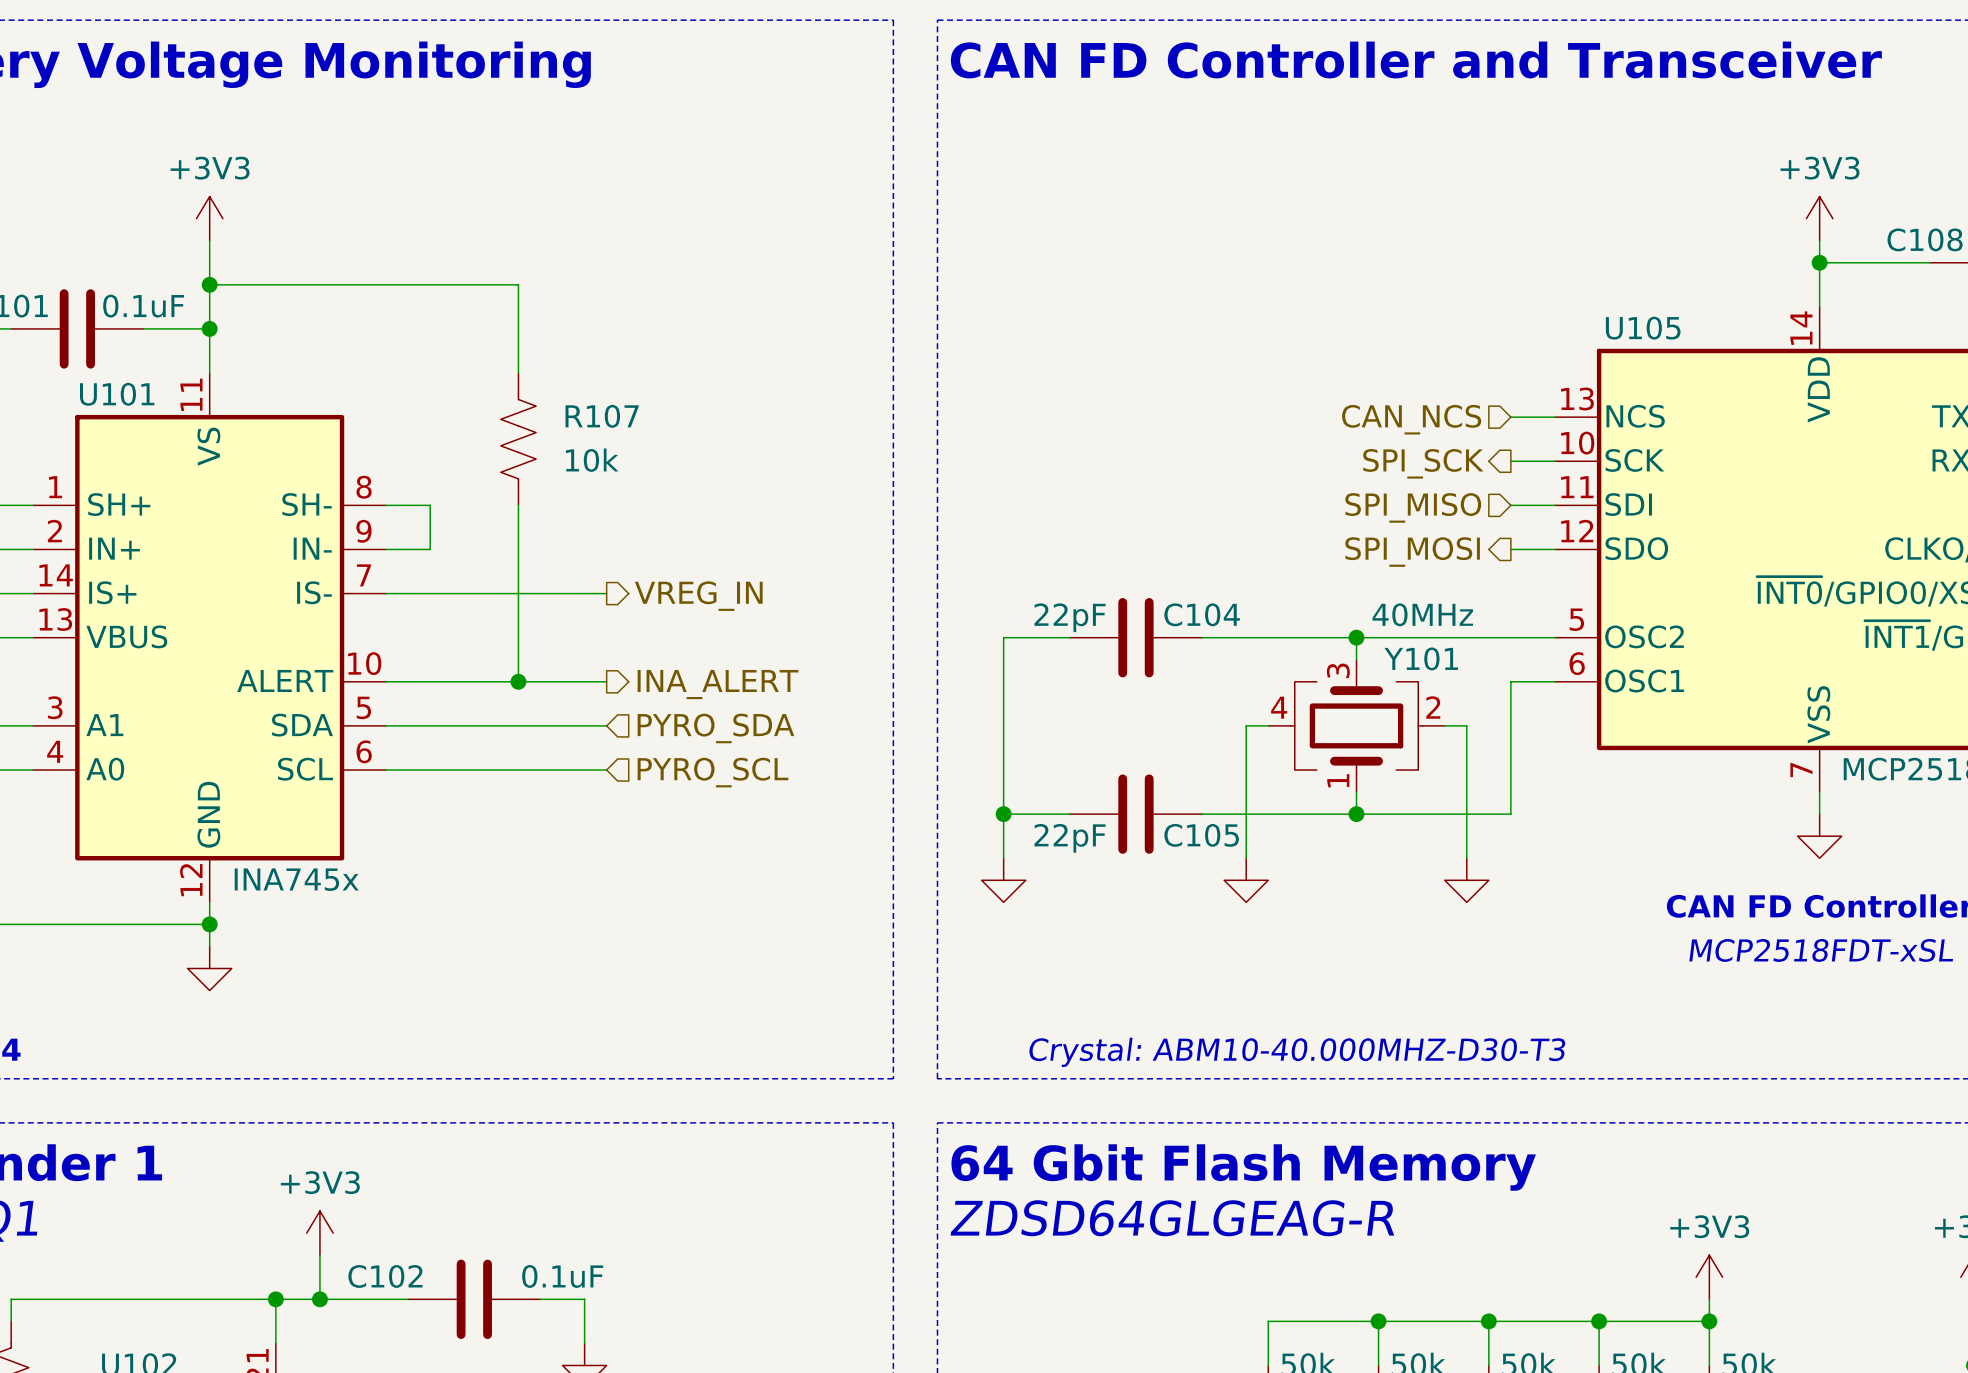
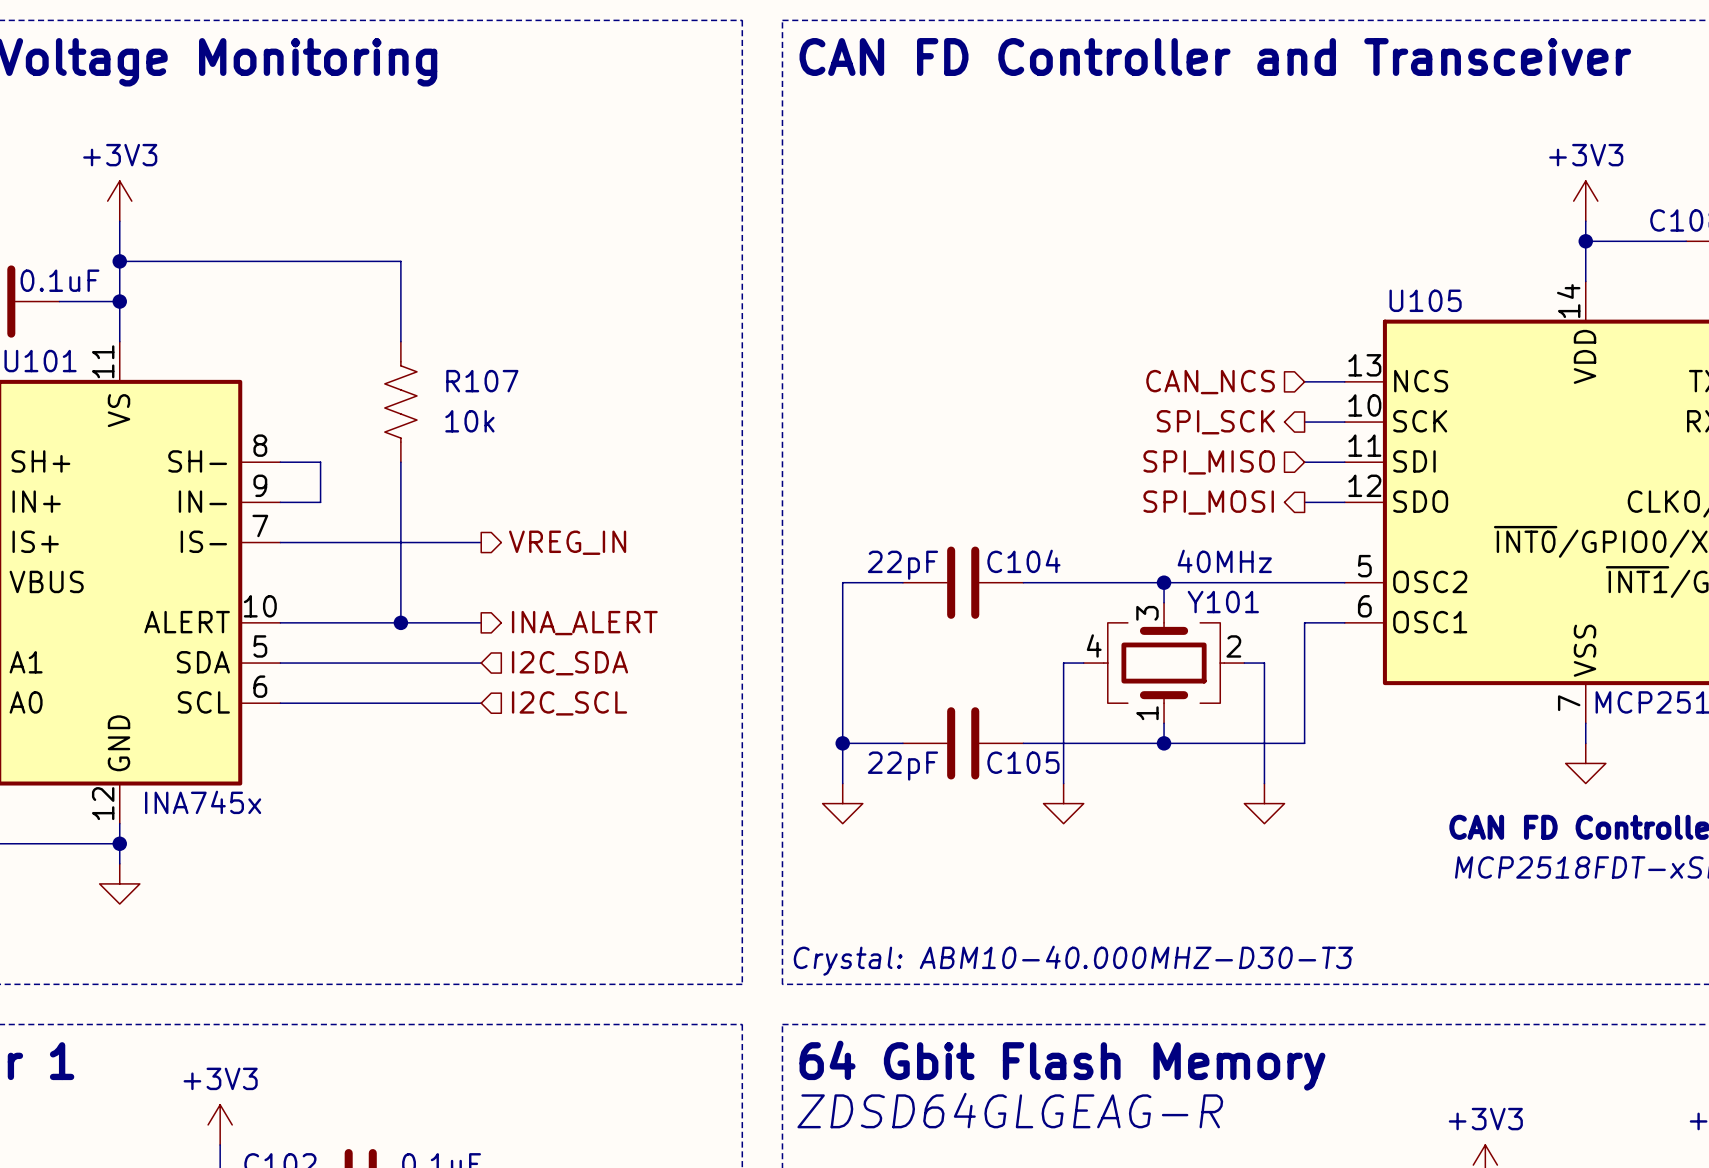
hierarchical label: PYRO_SDA (715, 728) -> I2C_SDA (570, 663)
hierarchical label: PYRO_SCL (712, 772) -> I2C_SCL (569, 703)

